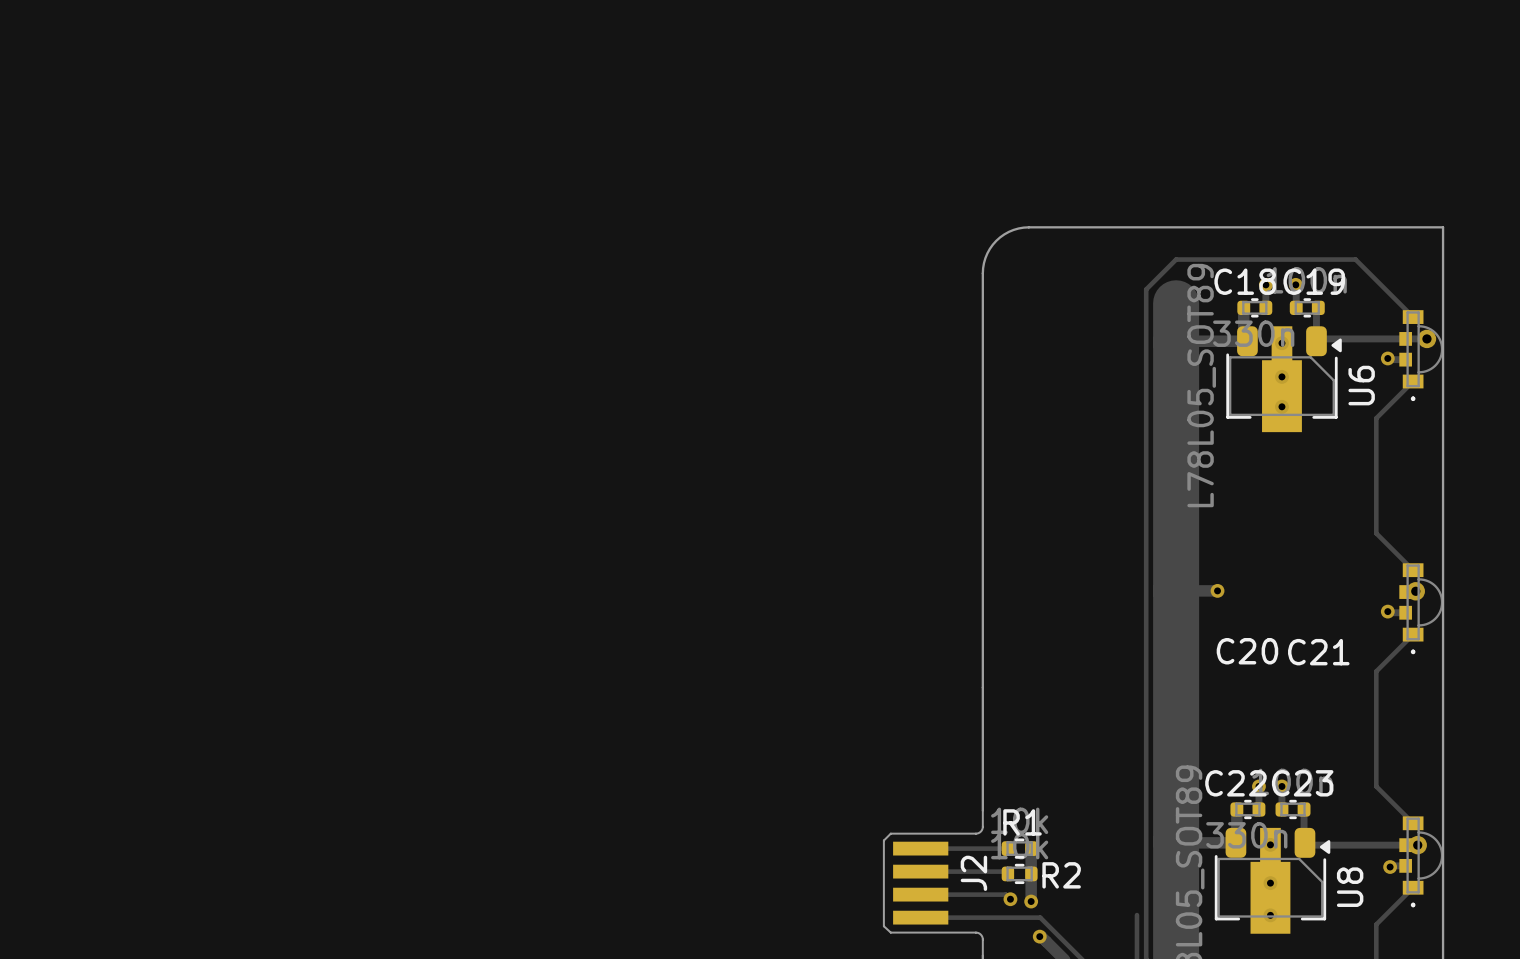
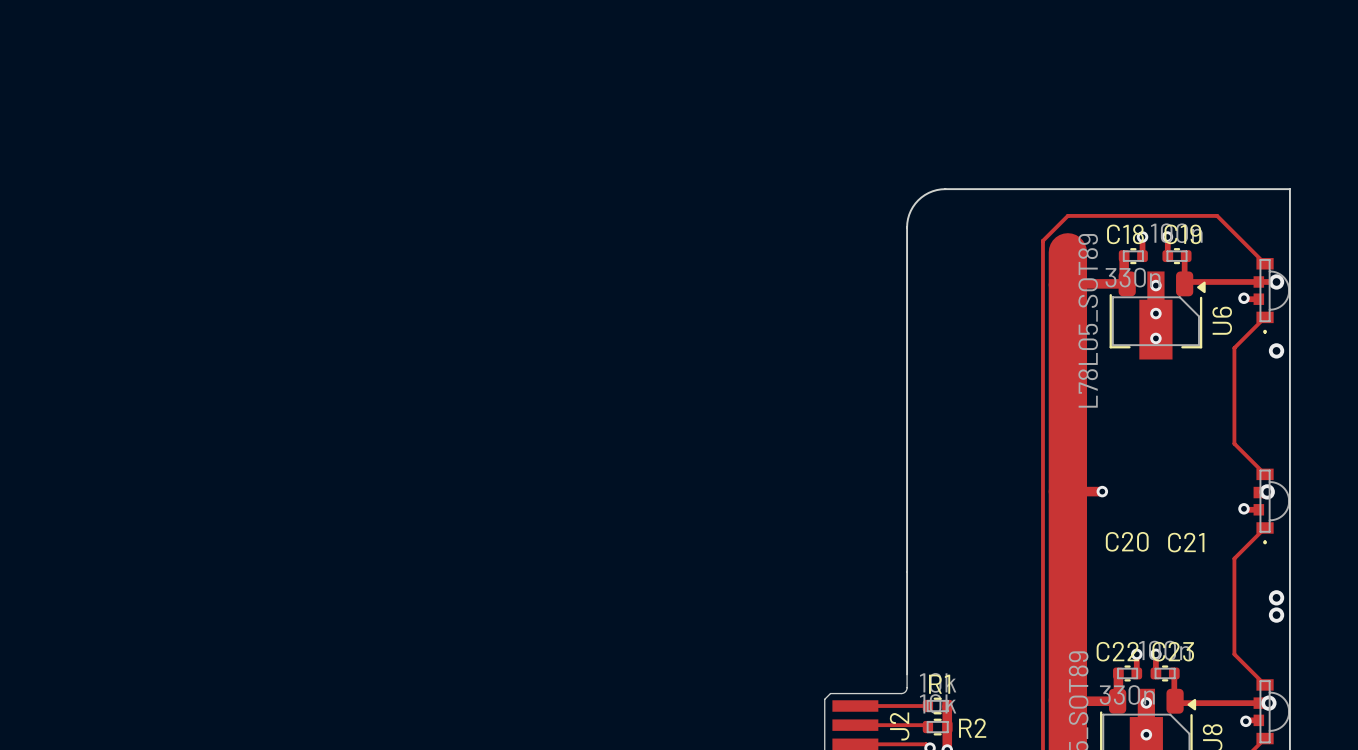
via: none -> (1276, 350)
via: none -> (1276, 597)
via: none -> (1276, 615)

